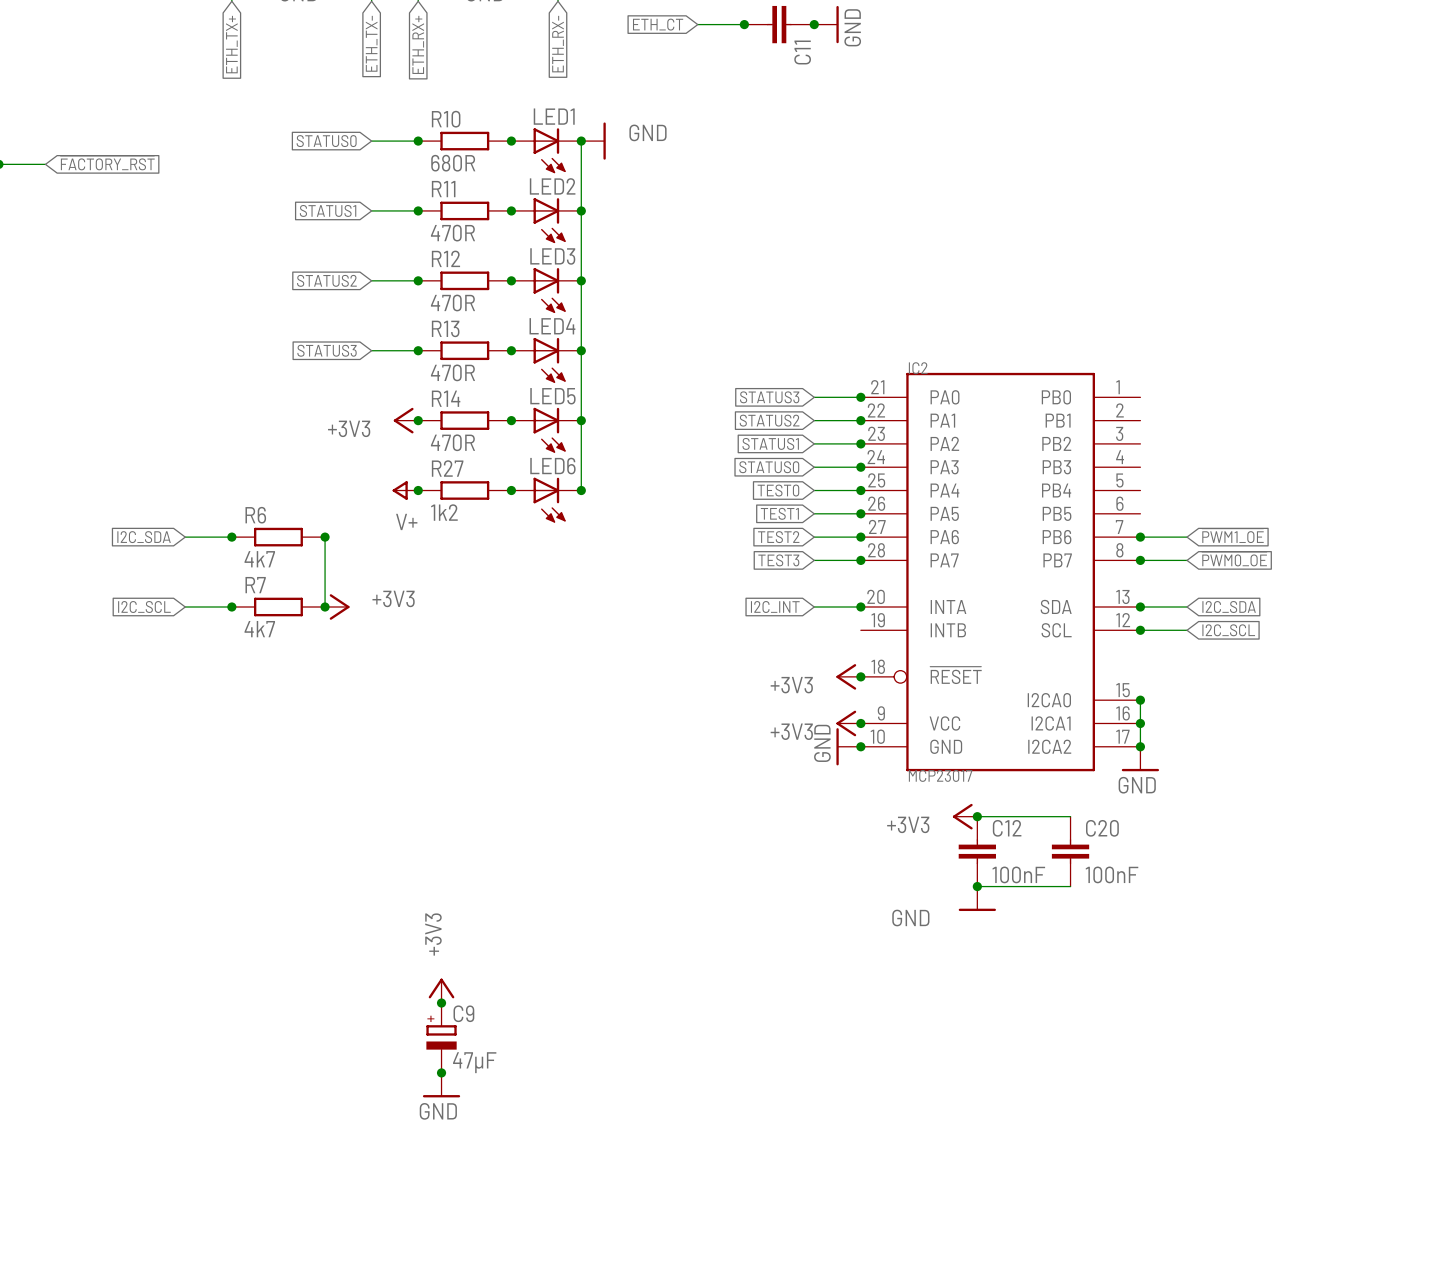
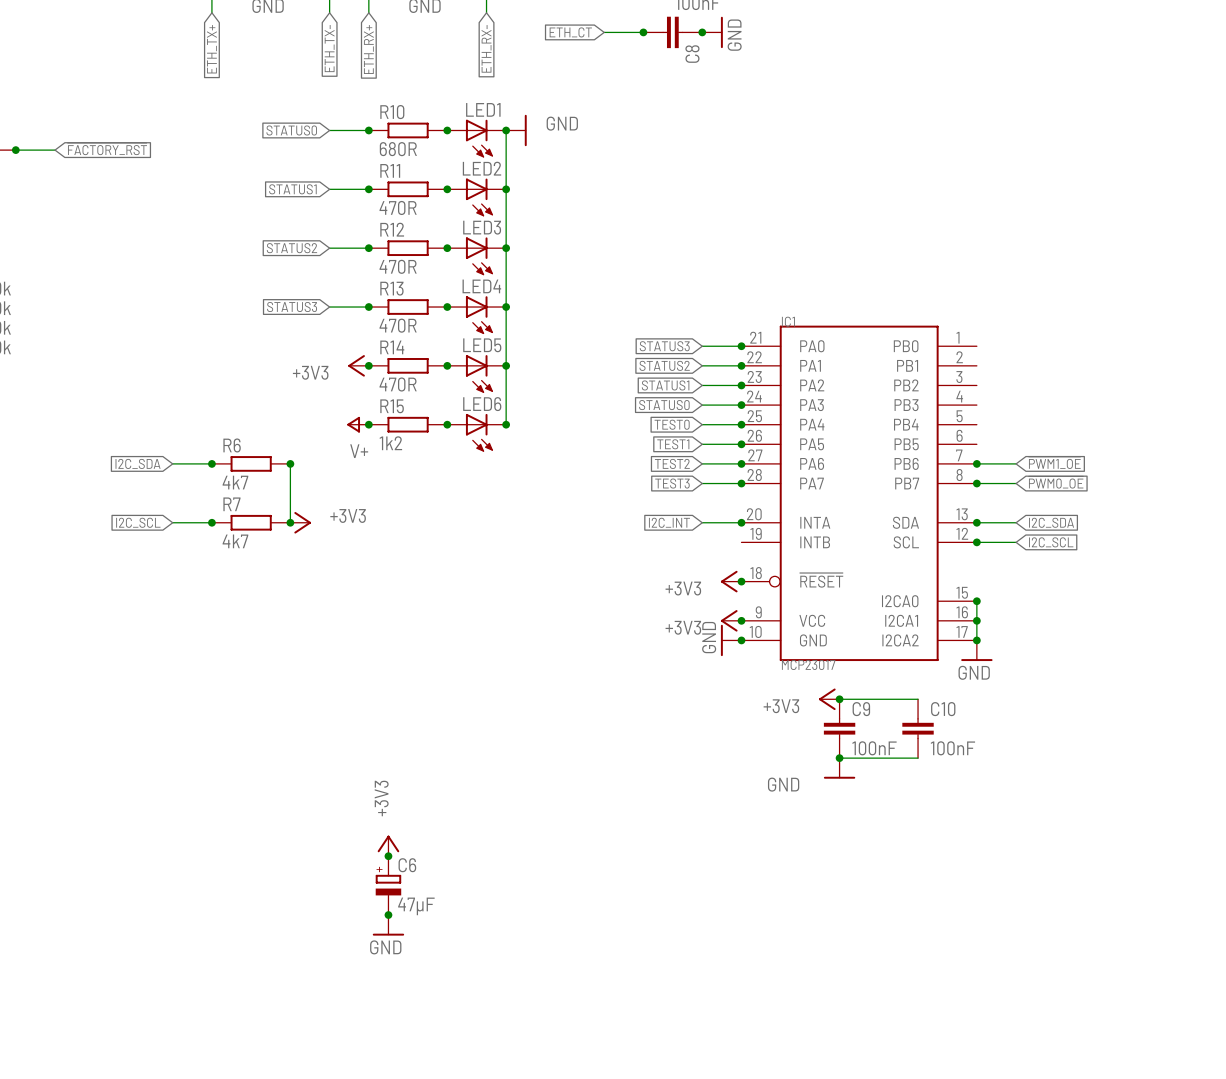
C11 name: C11 (802, 52) -> C8 (692, 54)
IC2 name: IC2 (918, 368) -> IC1 (788, 321)
R27 name: R27 (447, 468) -> R15 (392, 406)
C12 name: C12 (1007, 828) -> C9 (861, 709)
C20 name: C20 (1102, 828) -> C10 (943, 709)
C9 name: C9 (463, 1013) -> C6 (407, 865)

